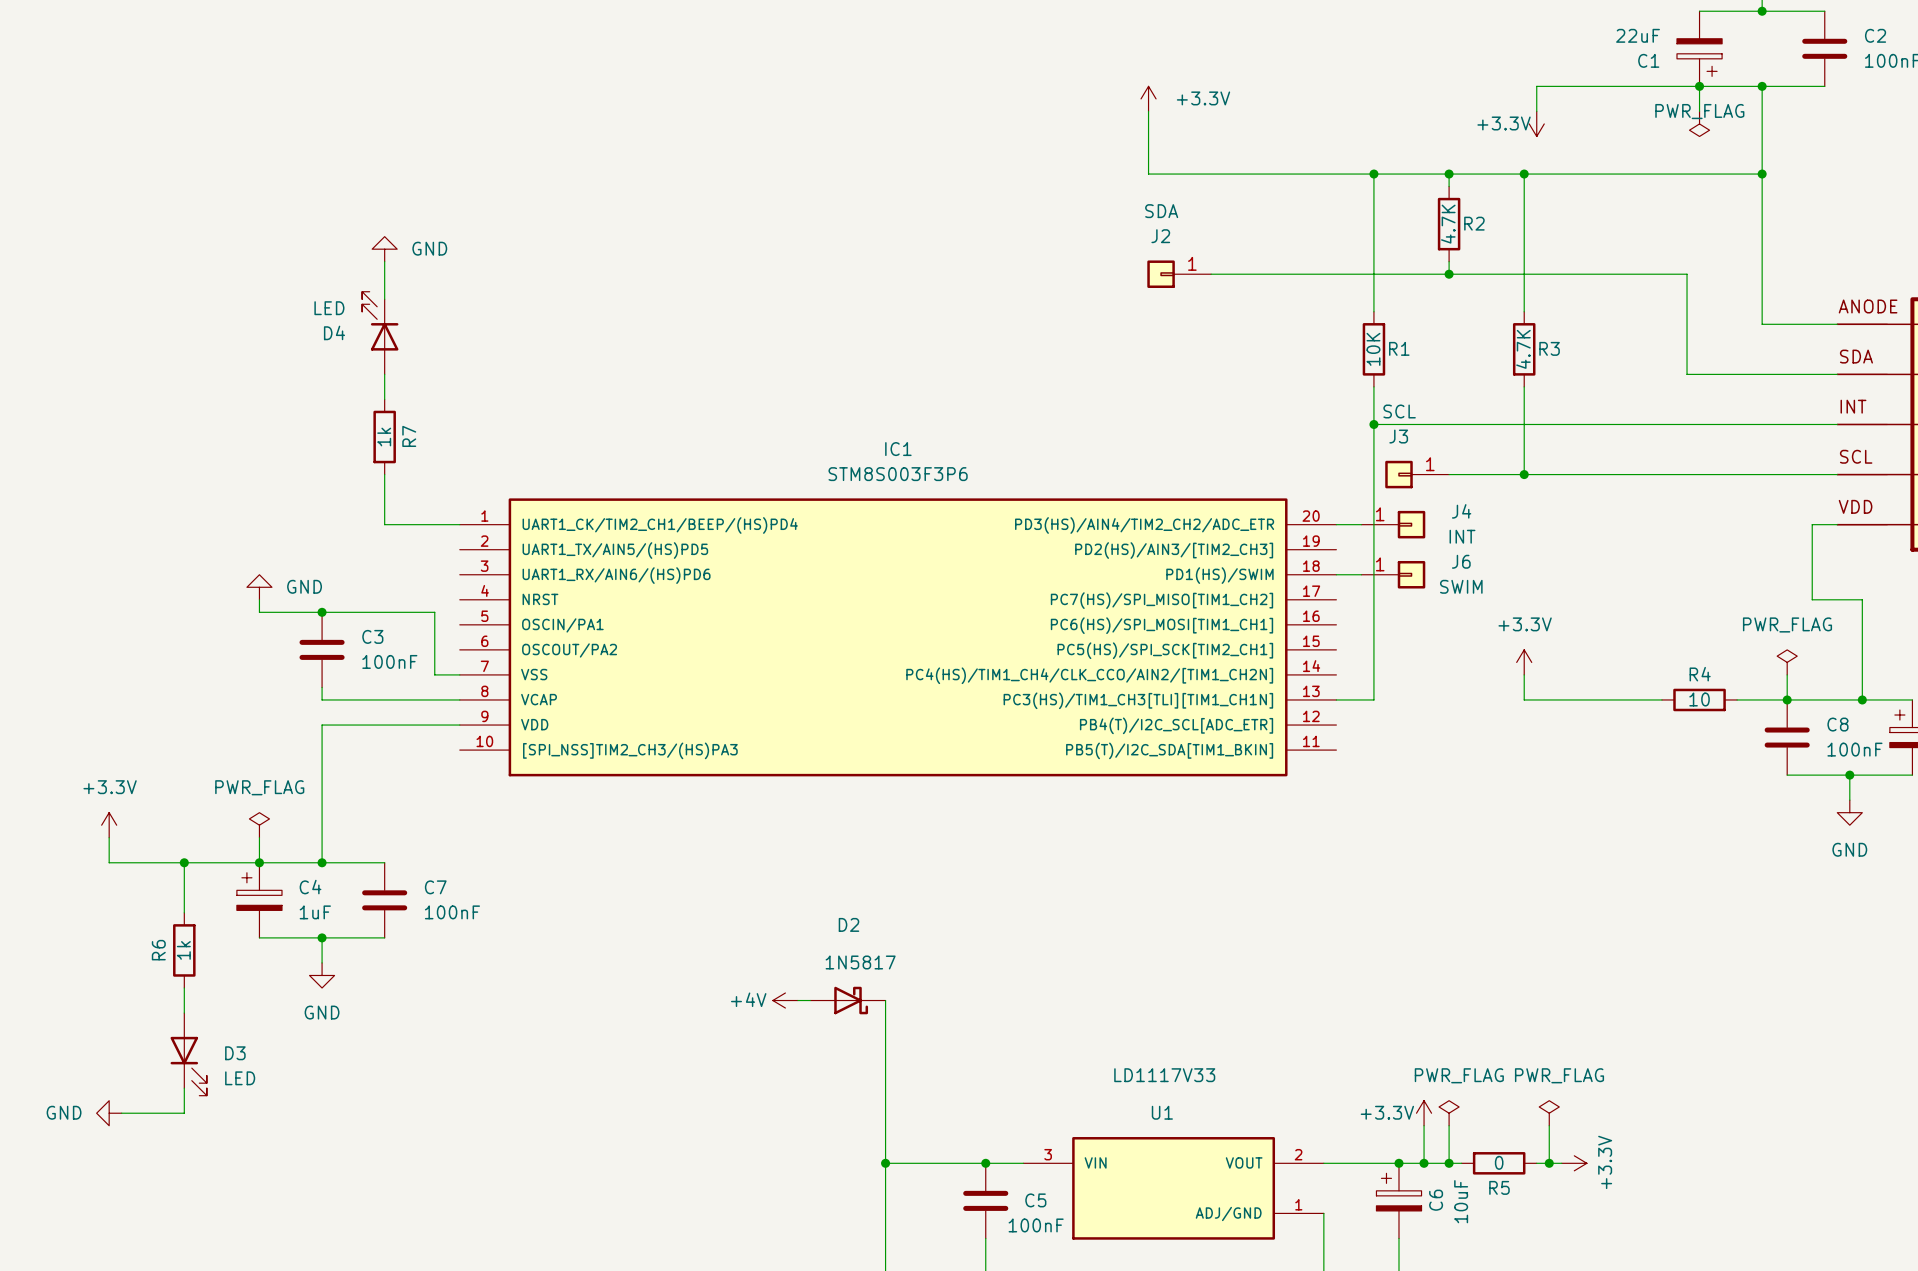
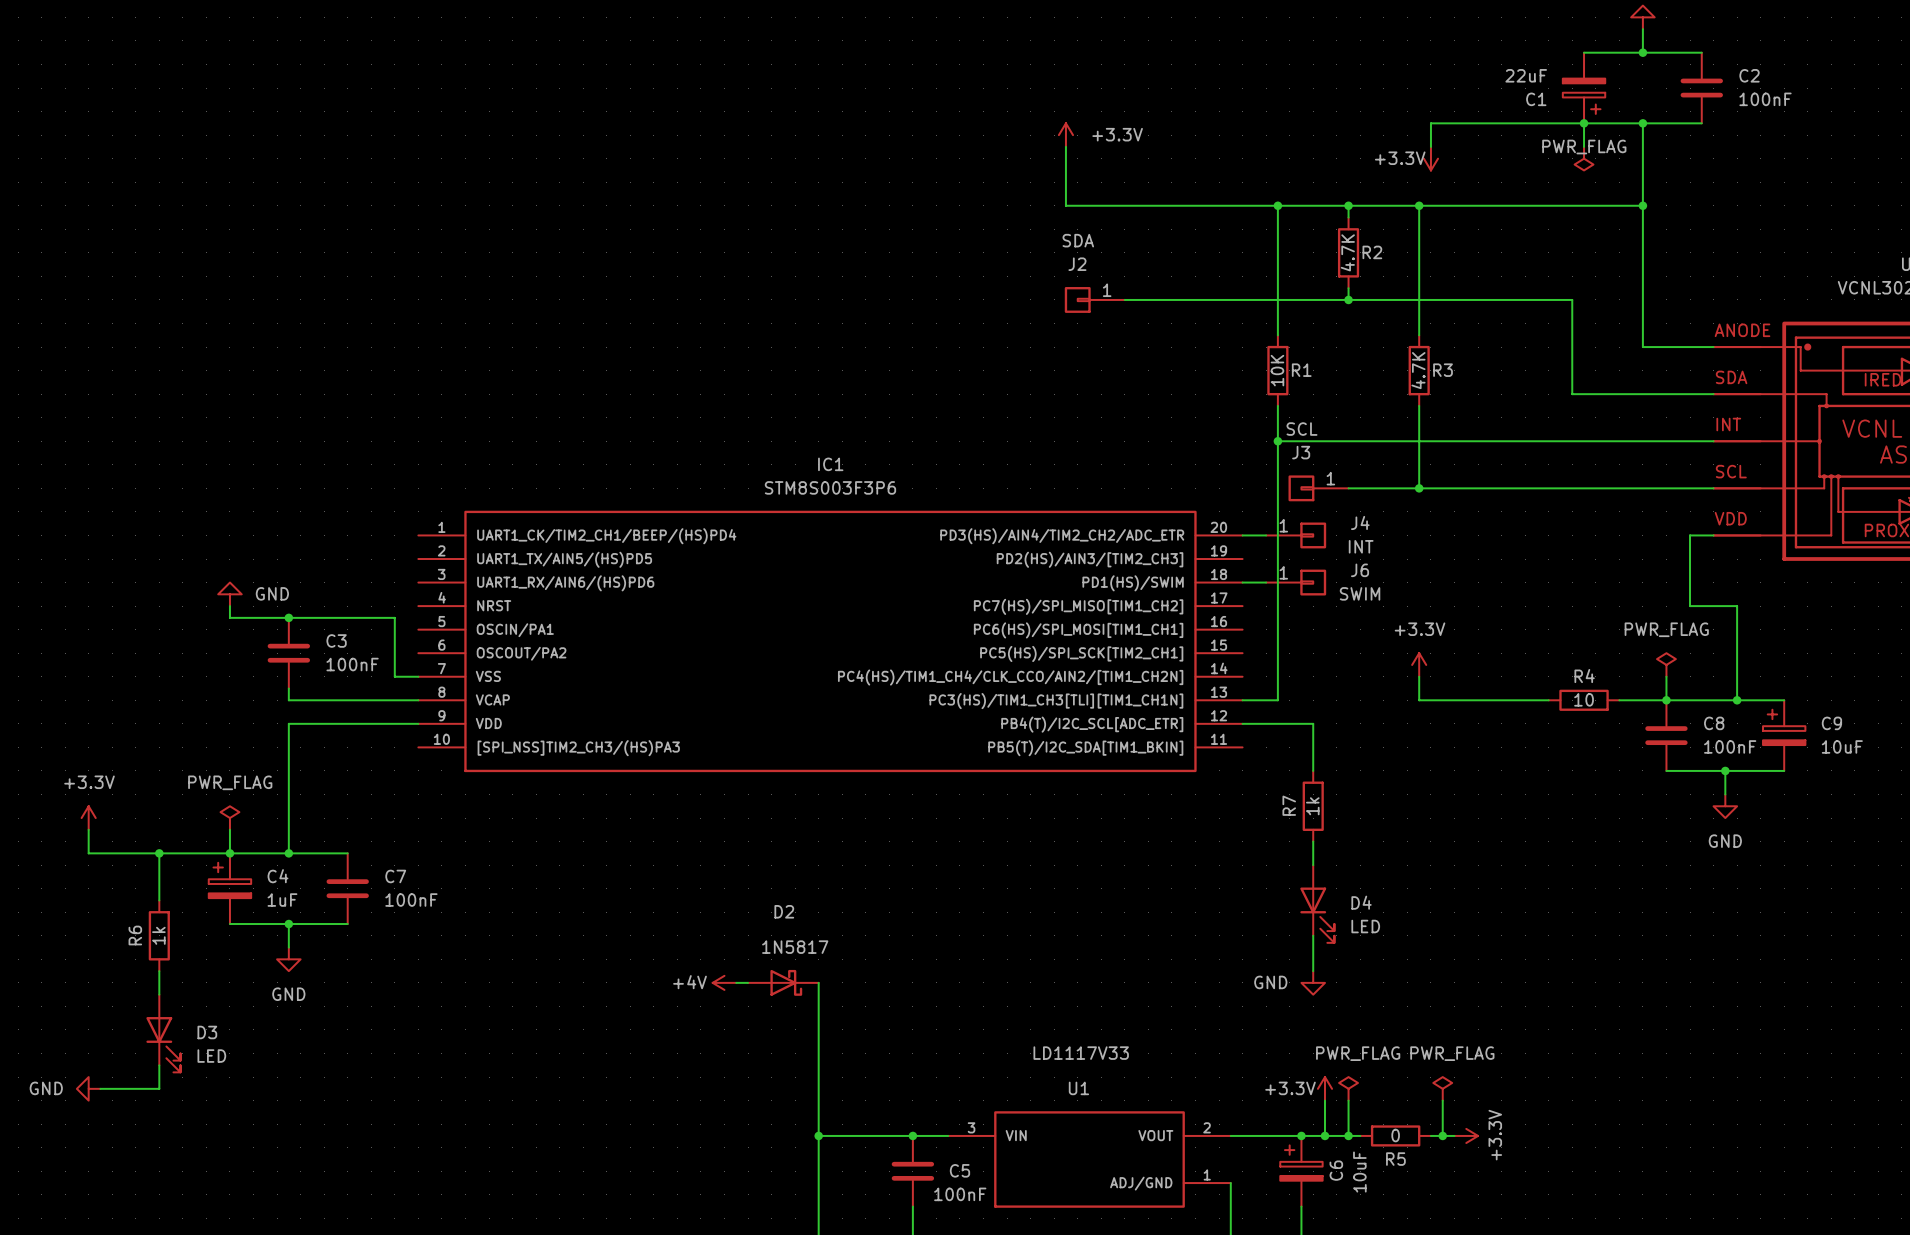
power symbol: GND (384, 249) -> none
wire: (384, 261) (384, 299) -> none
D4 rotation: 0° (380, 321) -> 180° (1317, 915)
D4 position: (380, 333) -> (1317, 903)
wire: (384, 374) (384, 399) -> none
R7 name position: R7 (409, 436) -> R7 (1289, 805)
R7 position: (384, 437) -> (1313, 806)
wire: (384, 474) (384, 524) (459, 524) -> none
wire: none -> (1242, 723) (1313, 723) (1313, 770)
wire: none -> (1313, 841) (1313, 865)
wire: none -> (1313, 935) (1313, 971)
power symbol: none -> GND (1313, 982)

